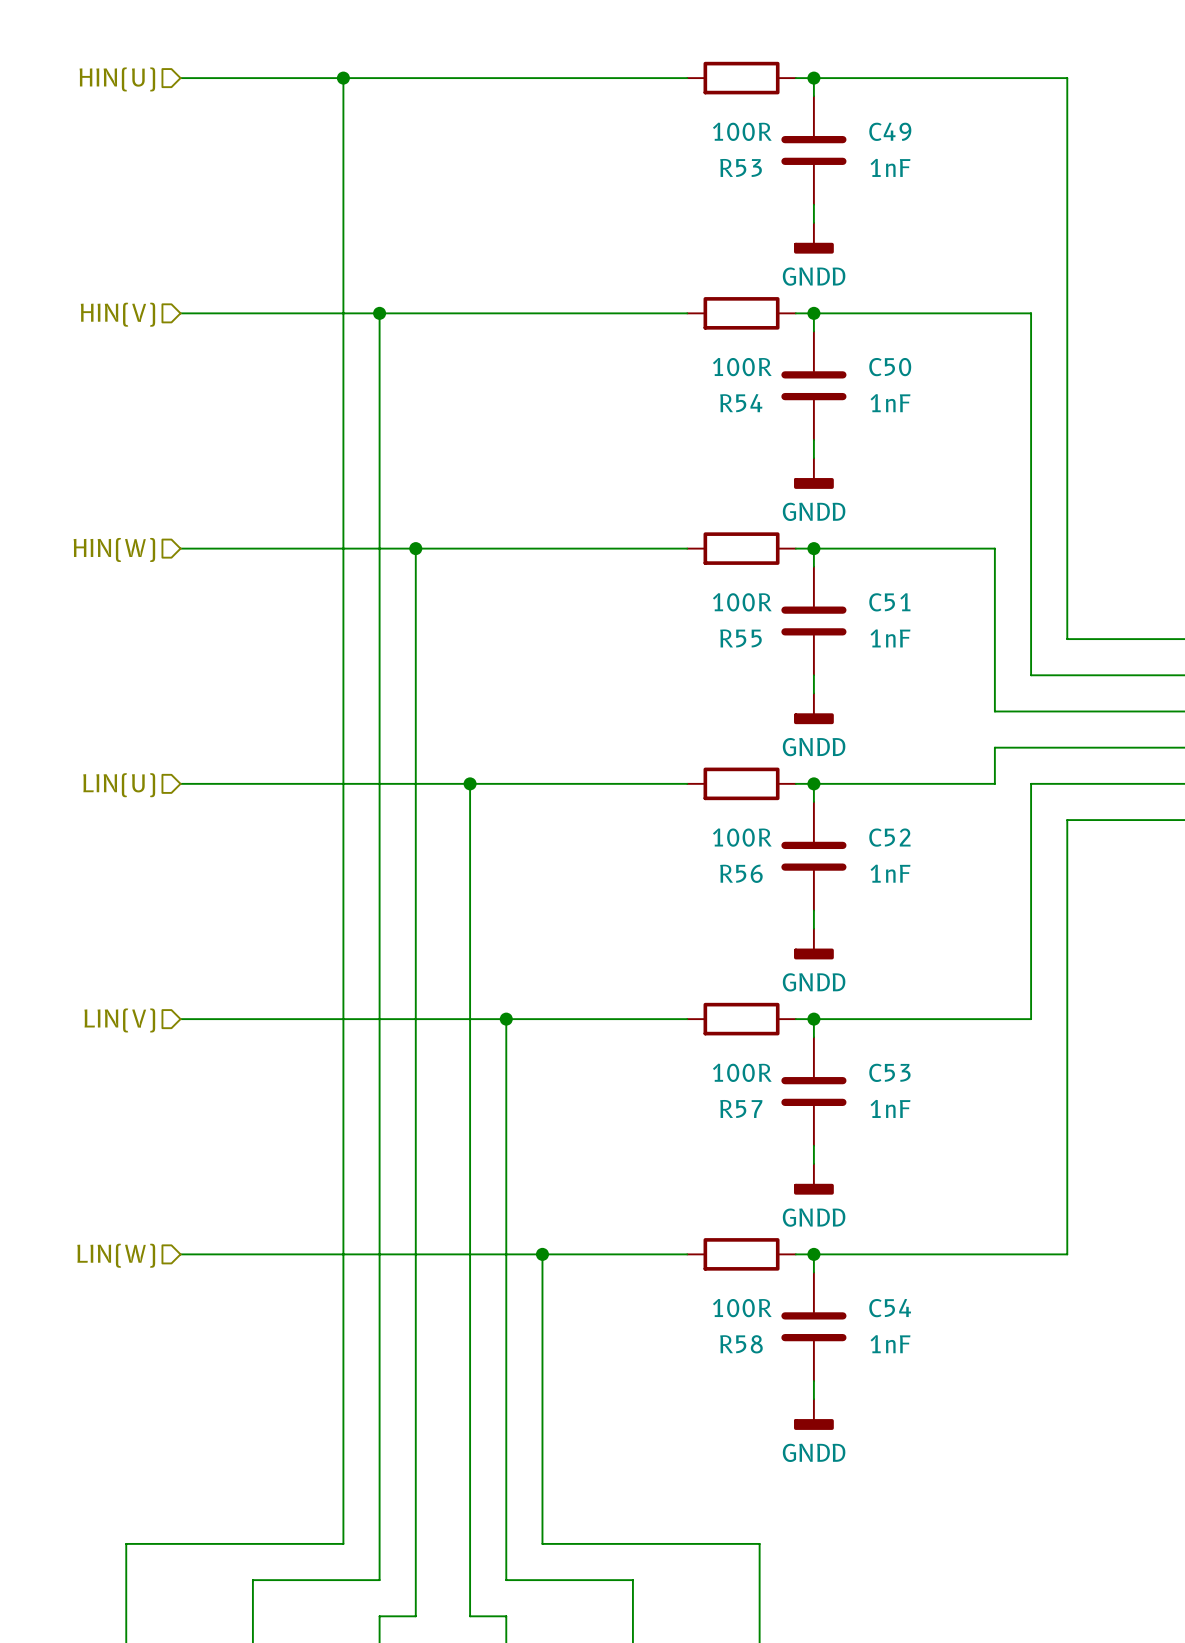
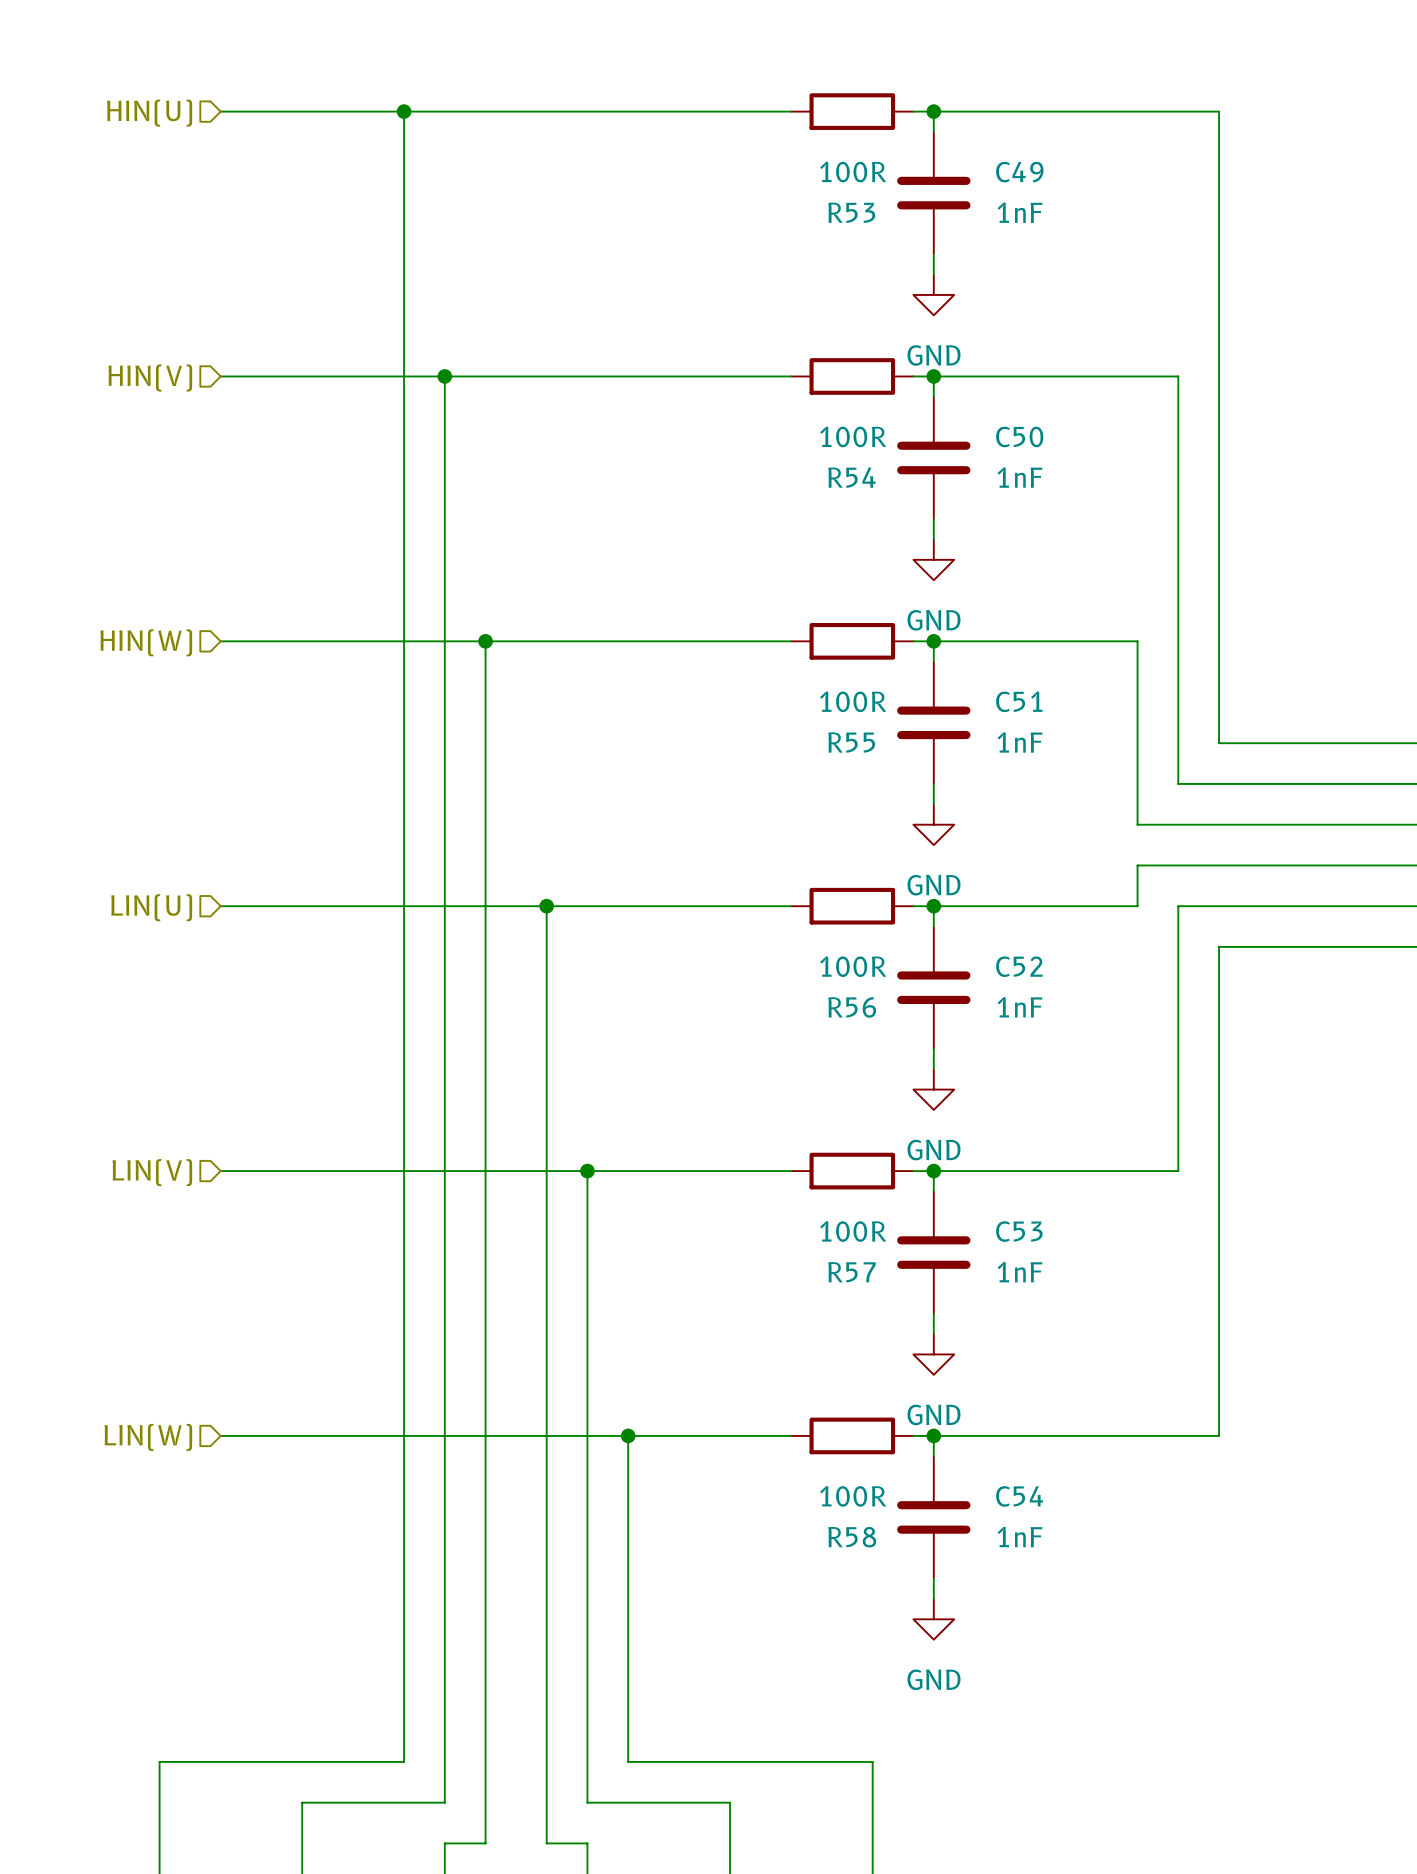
power symbol: GNDD (813, 238) -> GND (933, 294)
power symbol: GNDD (813, 473) -> GND (933, 559)
power symbol: GNDD (813, 708) -> GND (933, 824)
power symbol: GNDD (813, 944) -> GND (933, 1089)
power symbol: GNDD (813, 1179) -> GND (933, 1354)
power symbol: GNDD (813, 1414) -> GND (933, 1619)

